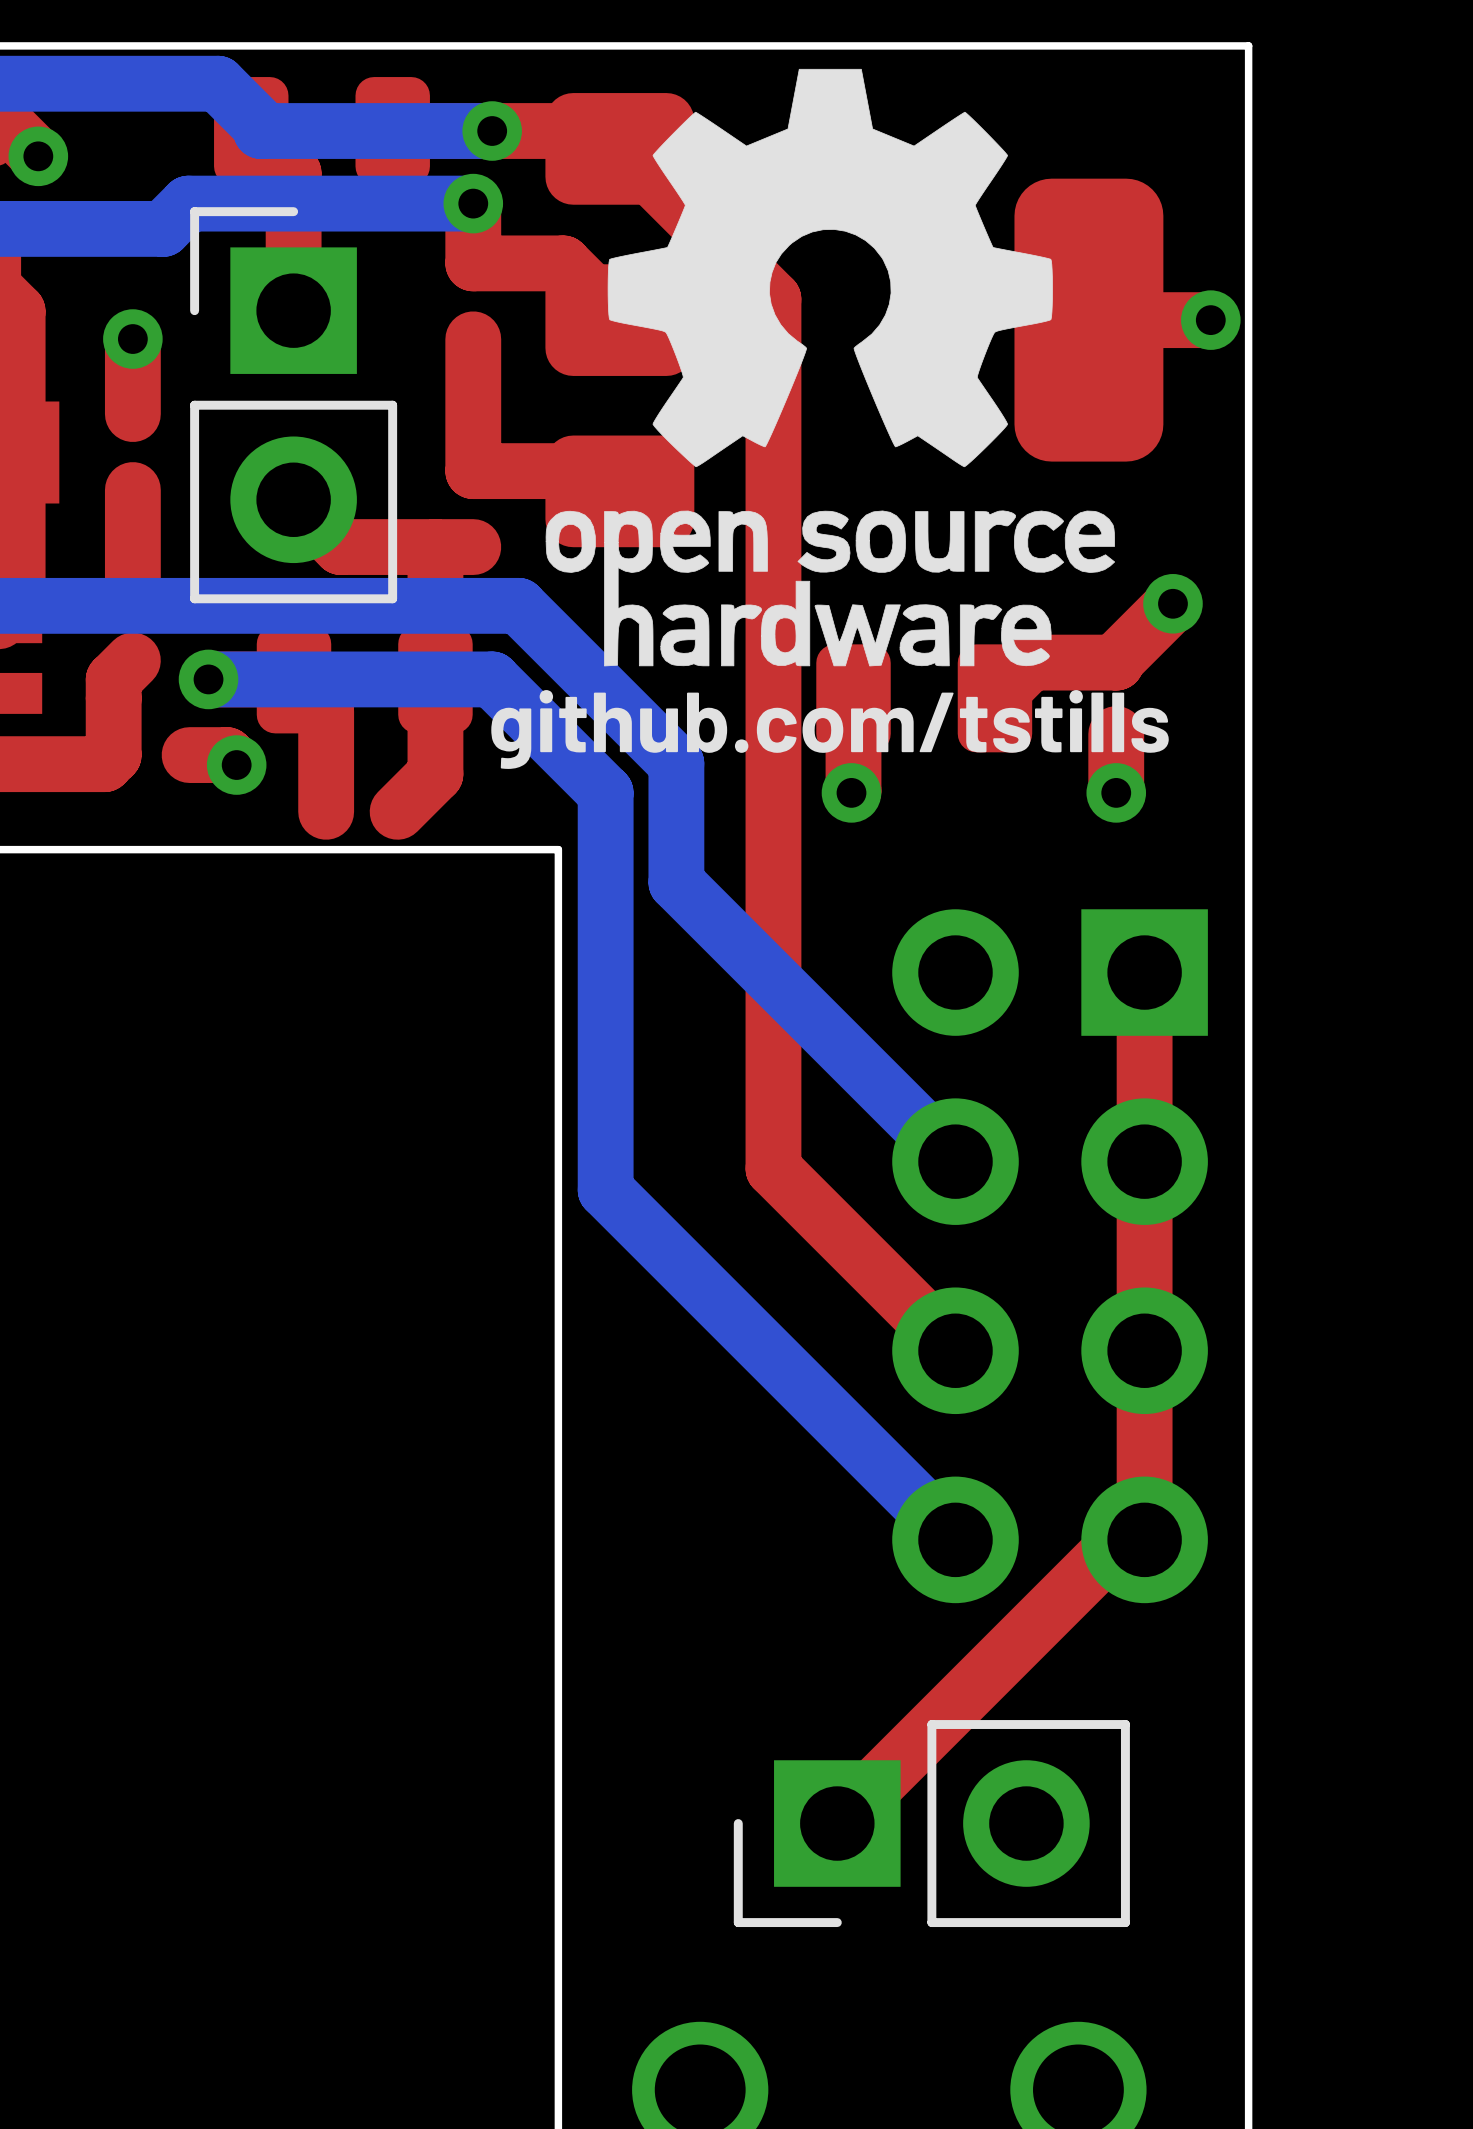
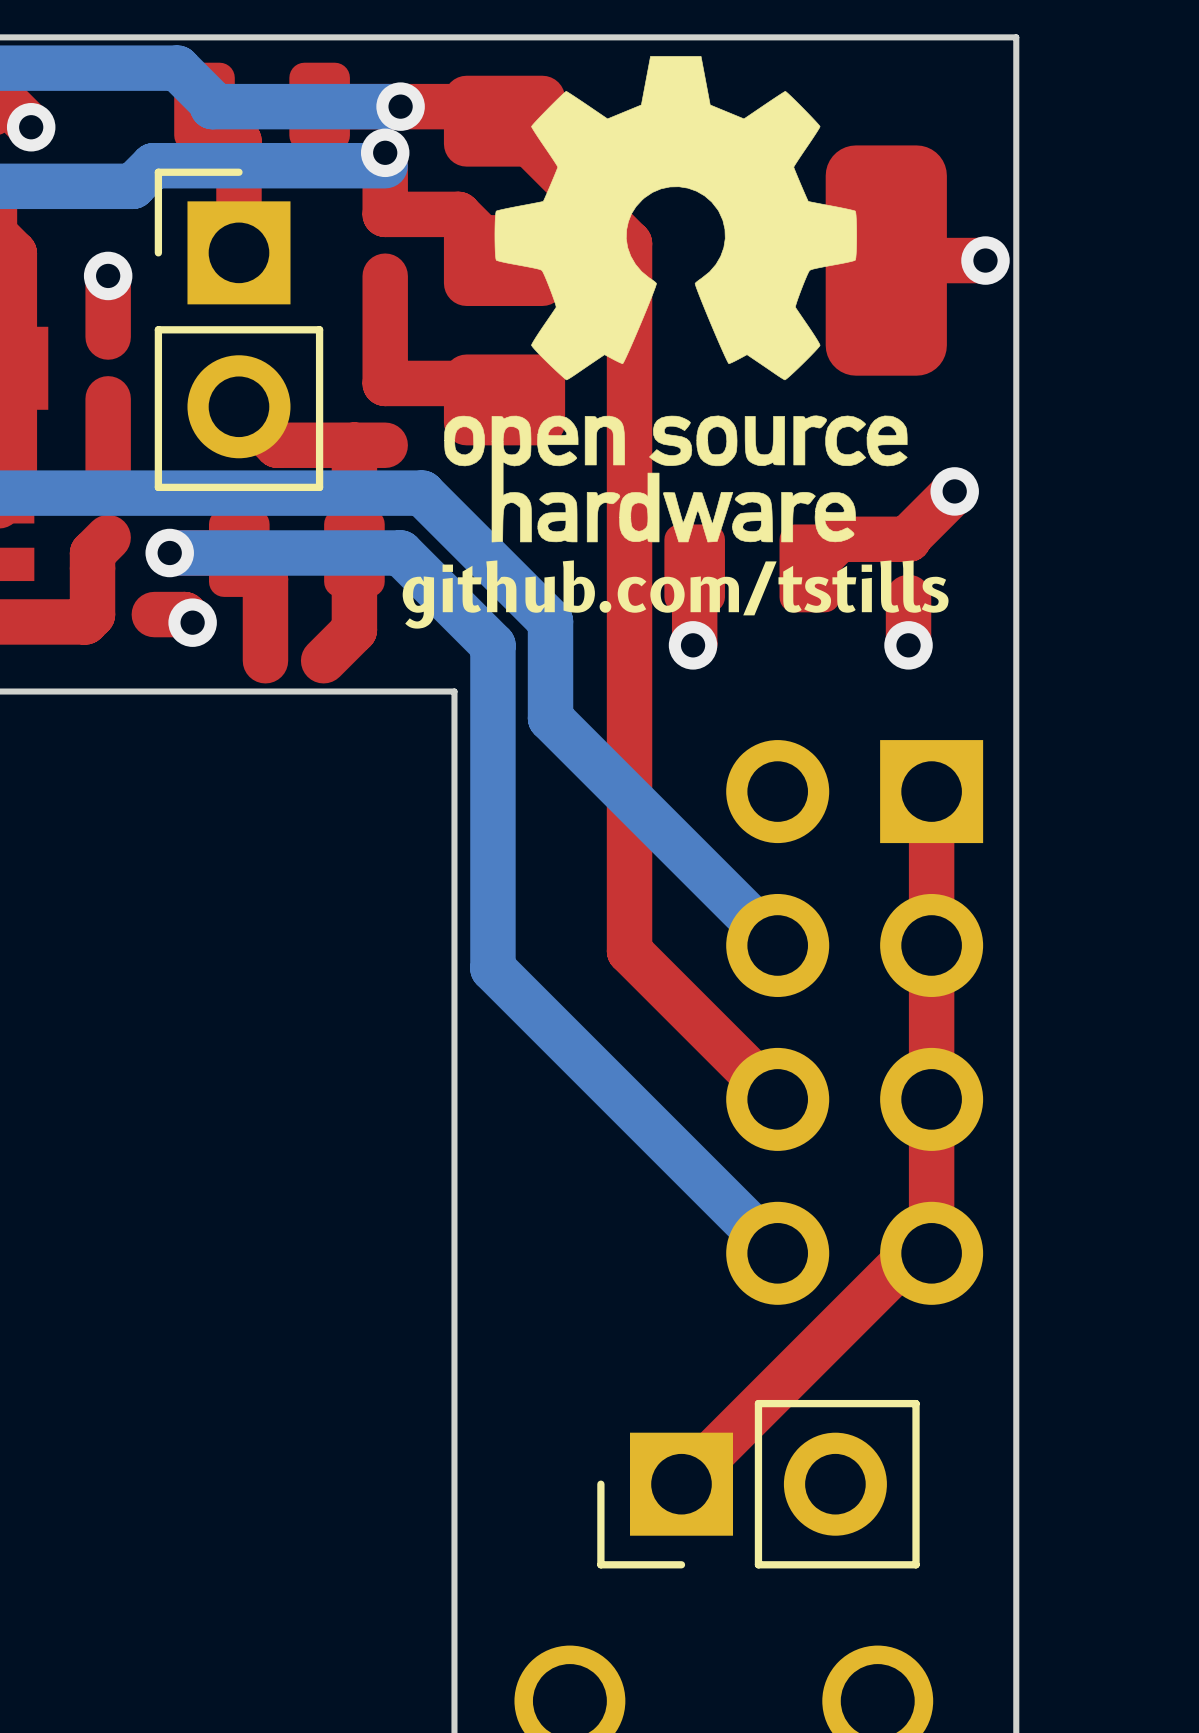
via position: (473, 203) -> (385, 152)

